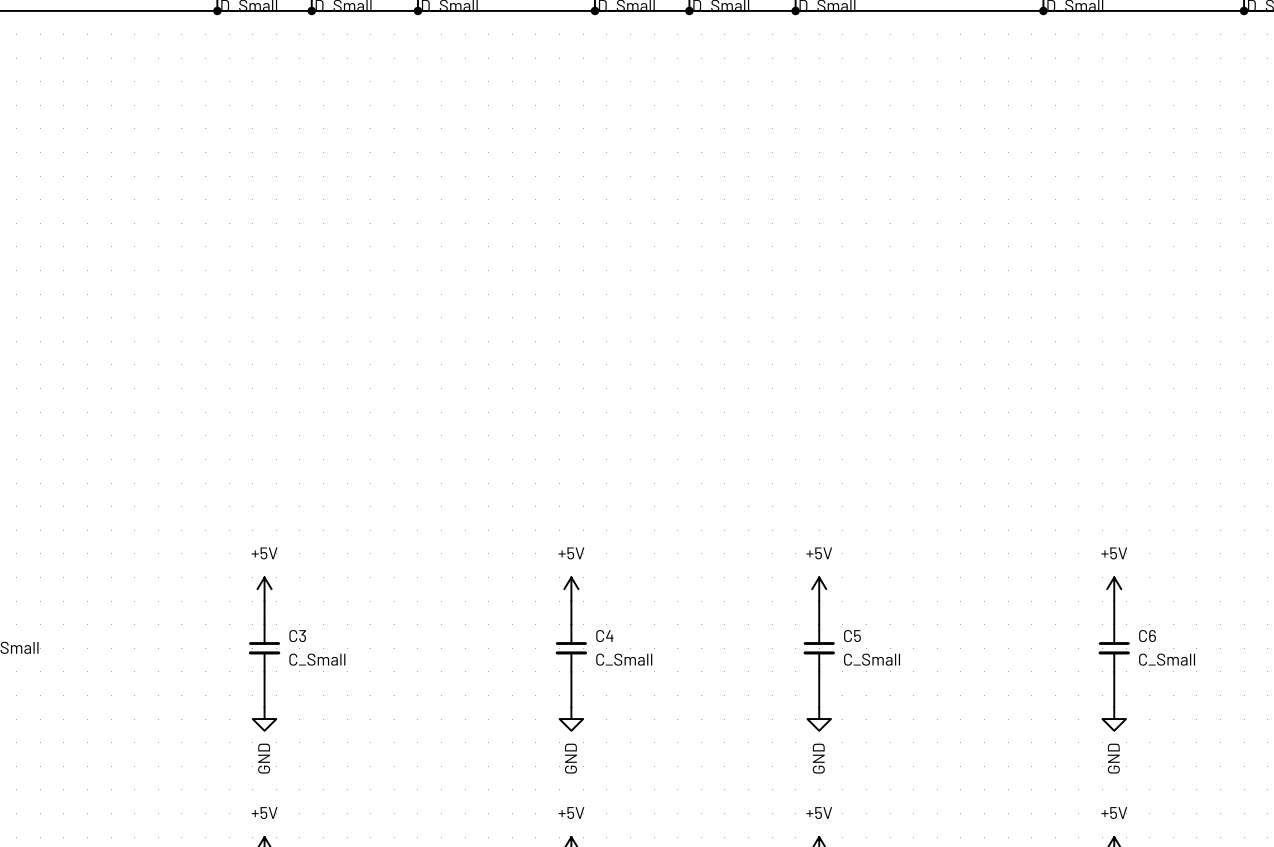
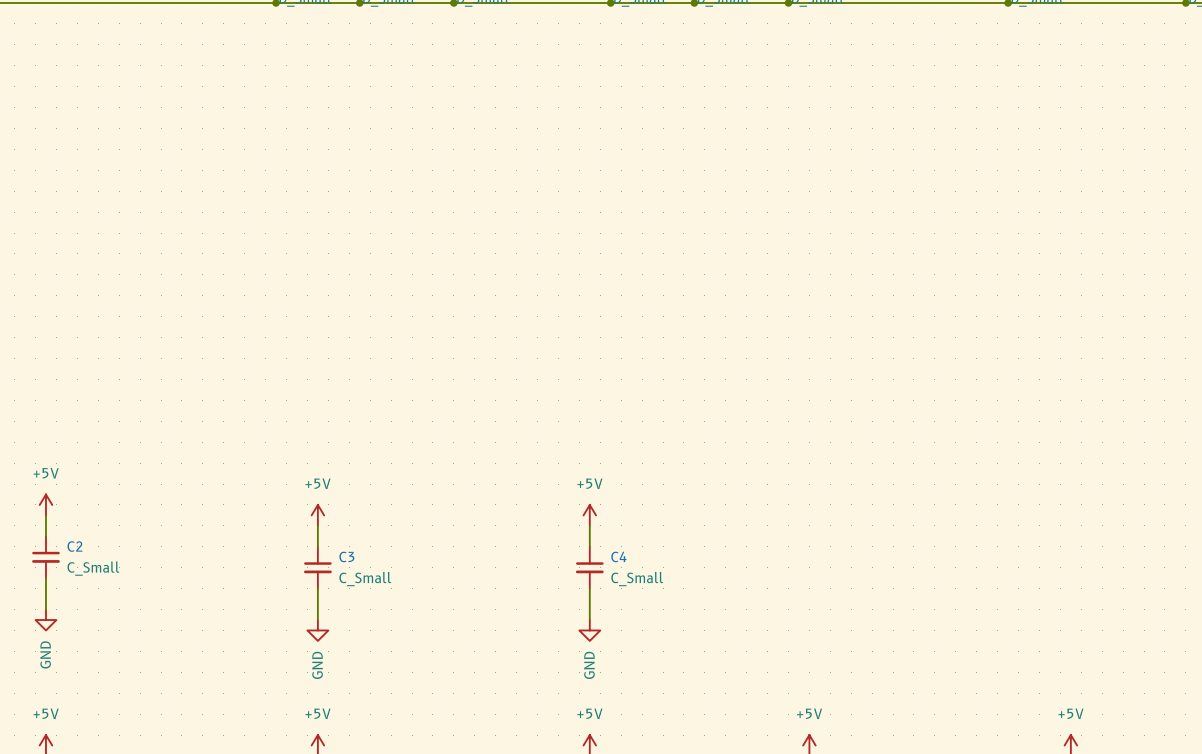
power symbol: +5V (819, 589) -> none
power symbol: +5V (1114, 589) -> none
wire: (819, 601) (819, 624) -> none
wire: (1114, 601) (1114, 624) -> none
C5: C_Small (819, 648) -> none
C6: C_Small (1114, 648) -> none
wire: (819, 671) (819, 707) -> none
wire: (1114, 671) (1114, 707) -> none
power symbol: GND (819, 719) -> none
power symbol: GND (1114, 719) -> none

